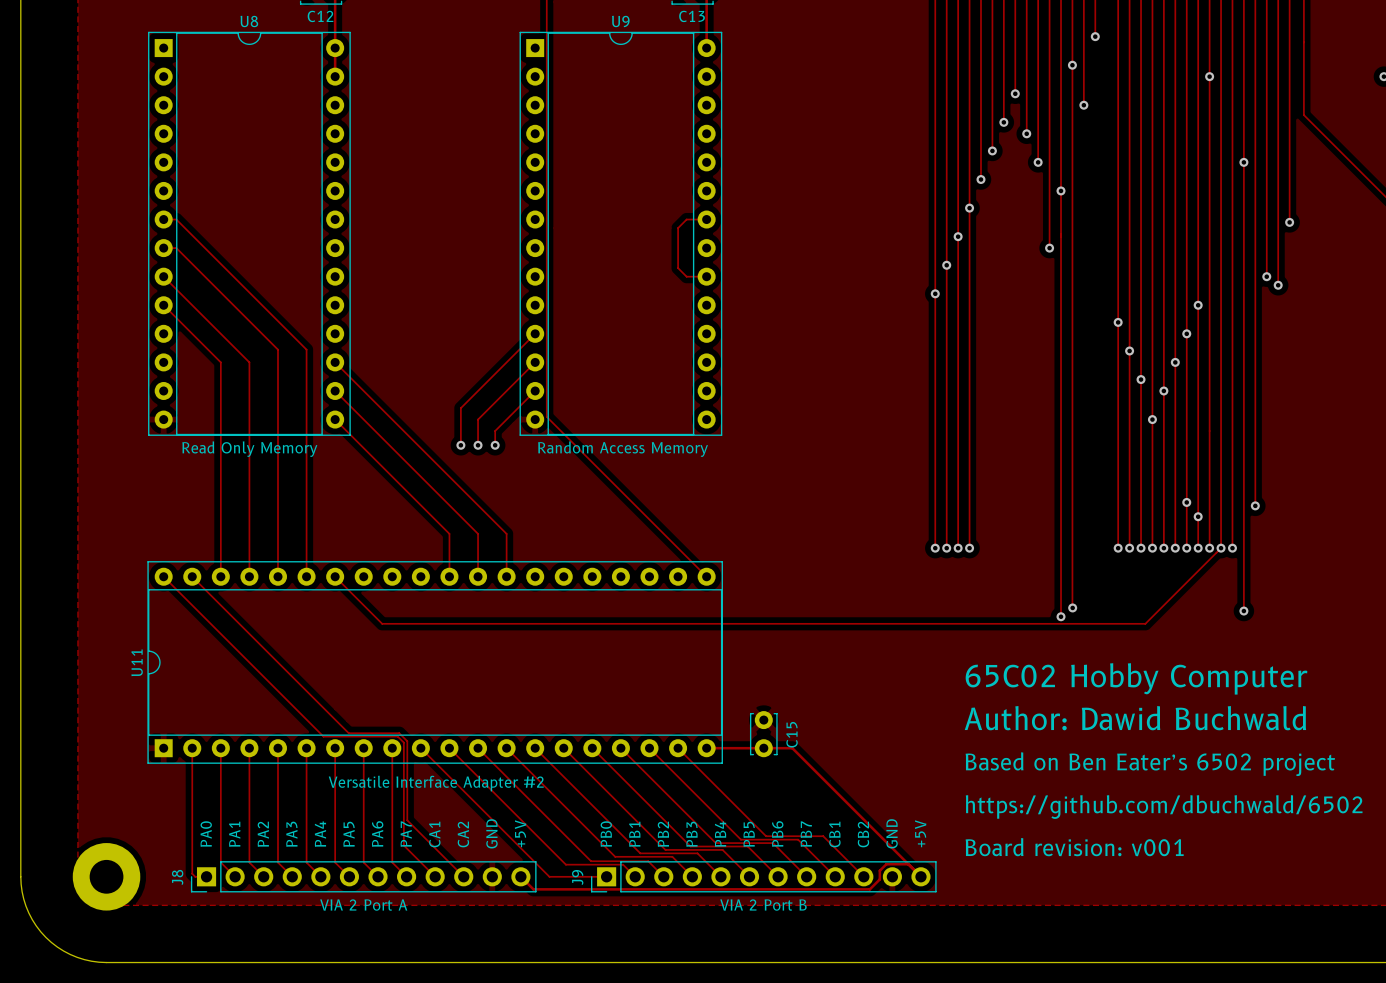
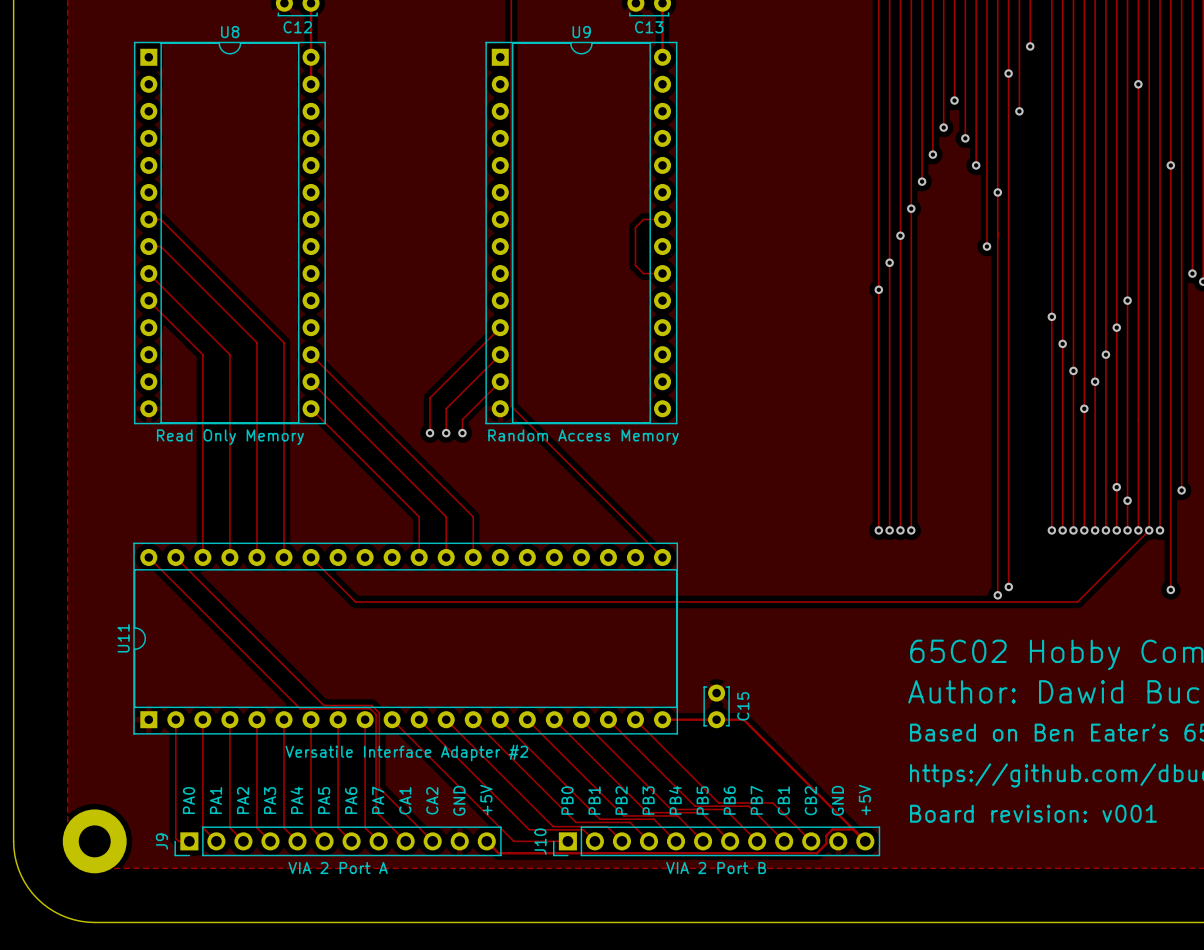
J8 name: J8 (177, 877) -> J9 (161, 841)
J9 name: J9 (577, 877) -> J10 (540, 841)

